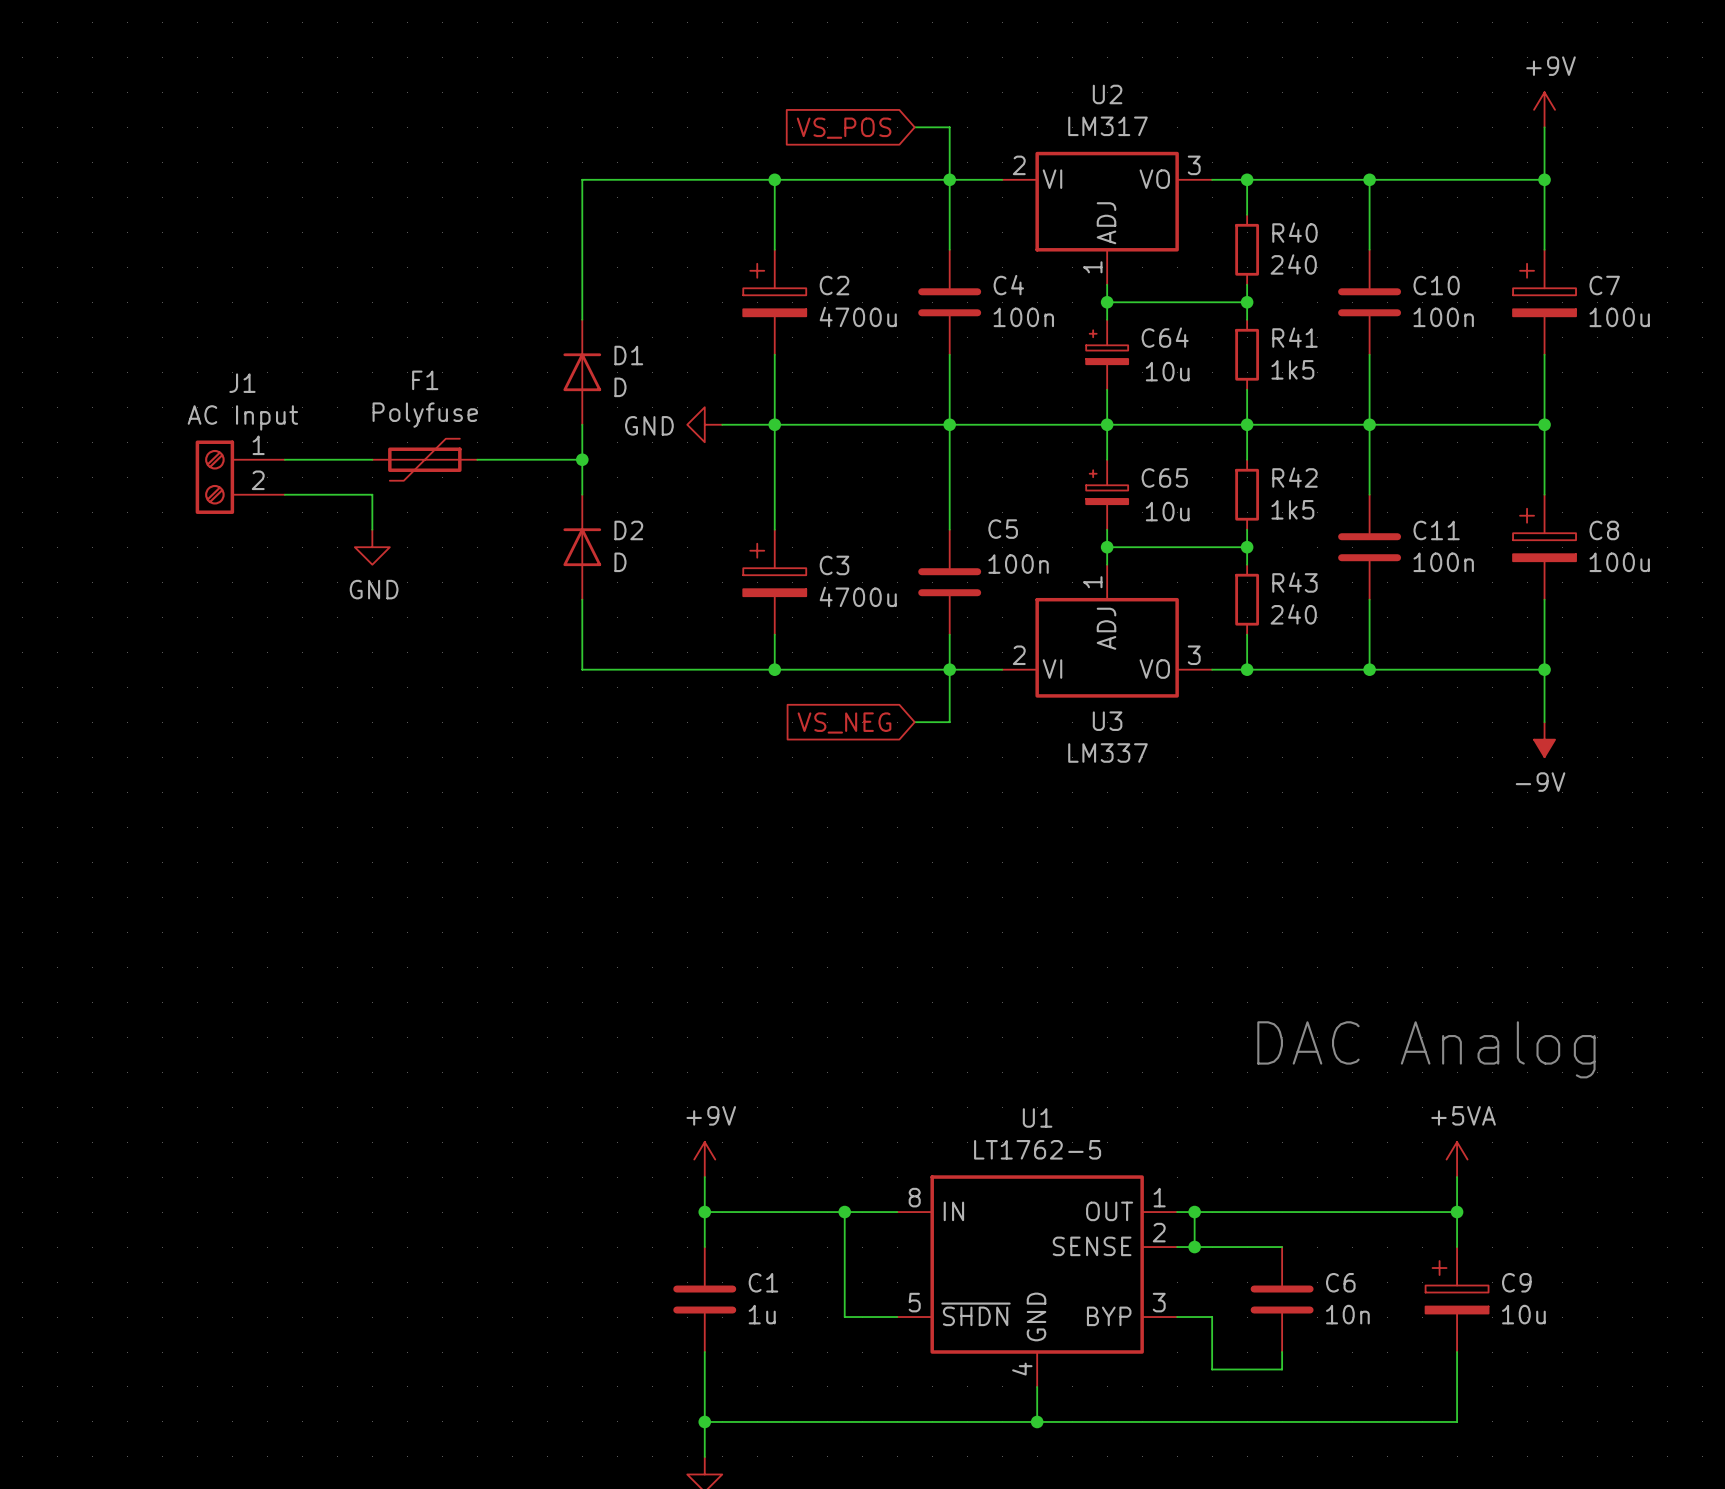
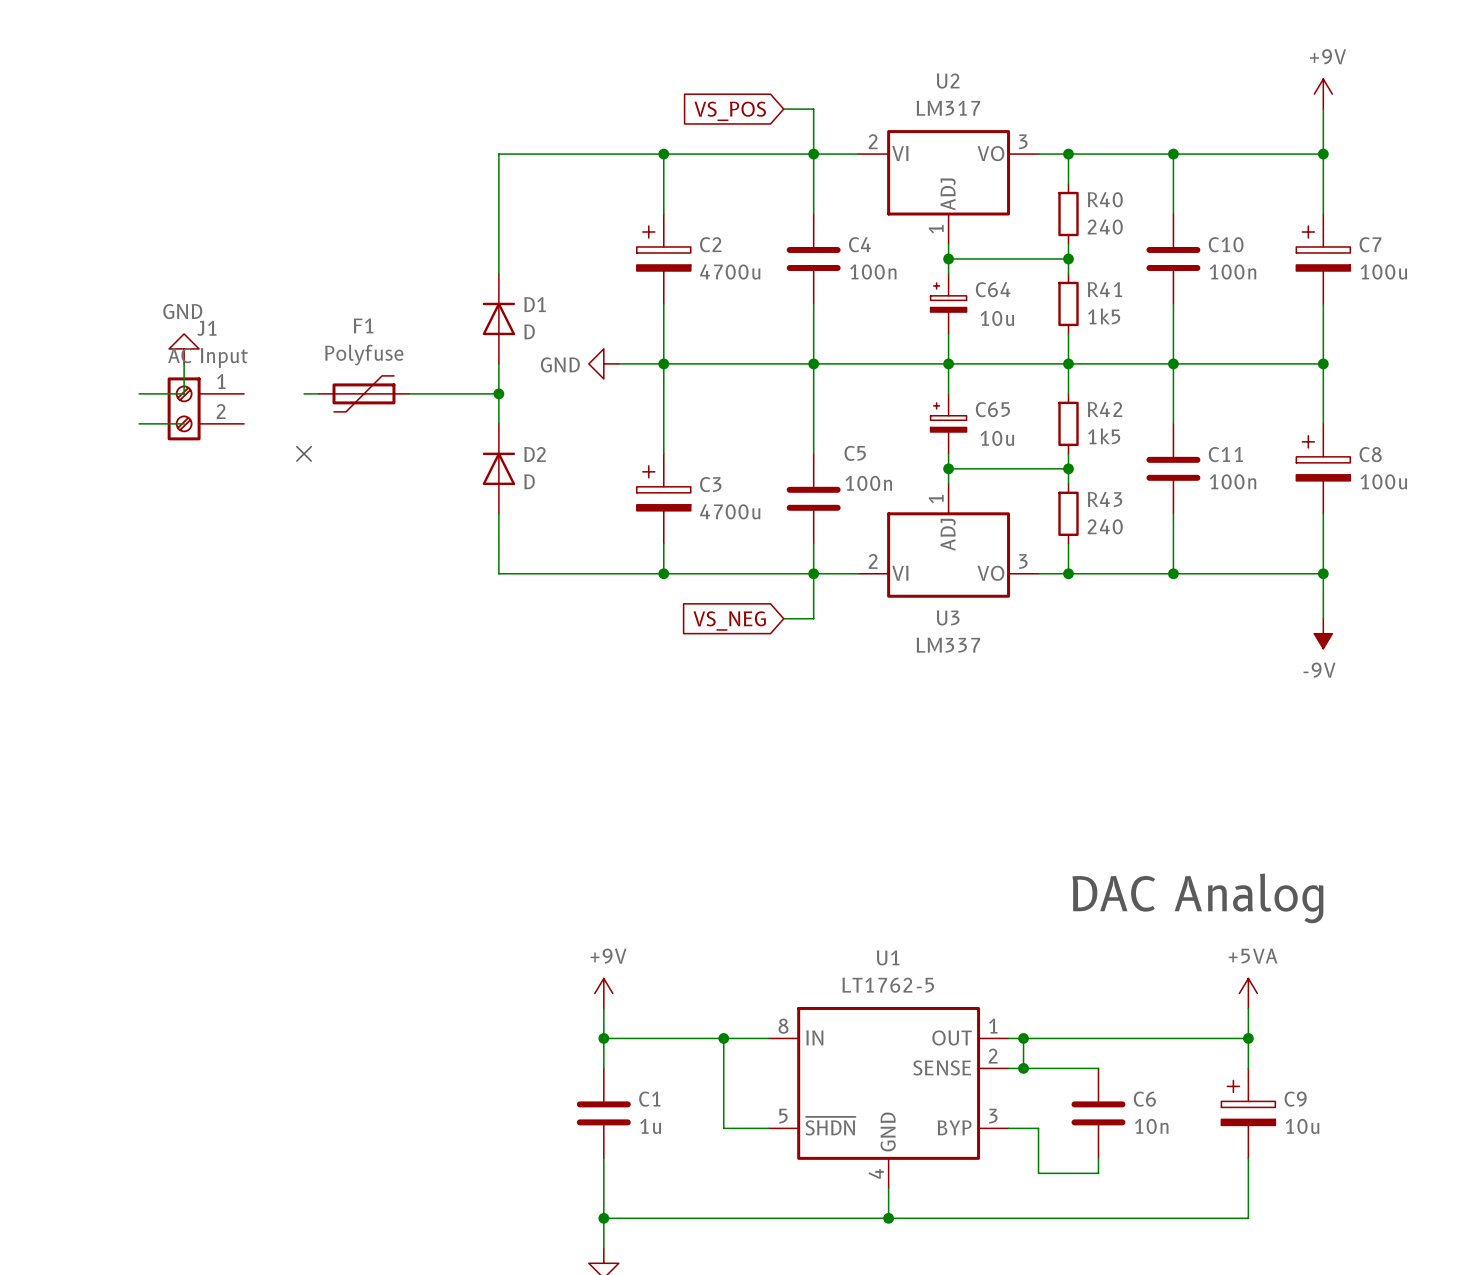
wire: none -> (184, 363) (184, 393) (139, 393)
wire: (284, 459) (354, 459) -> none
wire: none -> (139, 423) (184, 423)
wire: (284, 494) (372, 494) (372, 529) -> none
no-connect mark: none -> (304, 453)
power symbol rotation: 0° (372, 547) -> 180° (184, 348)
power symbol position: GND (372, 547) -> GND (184, 348)

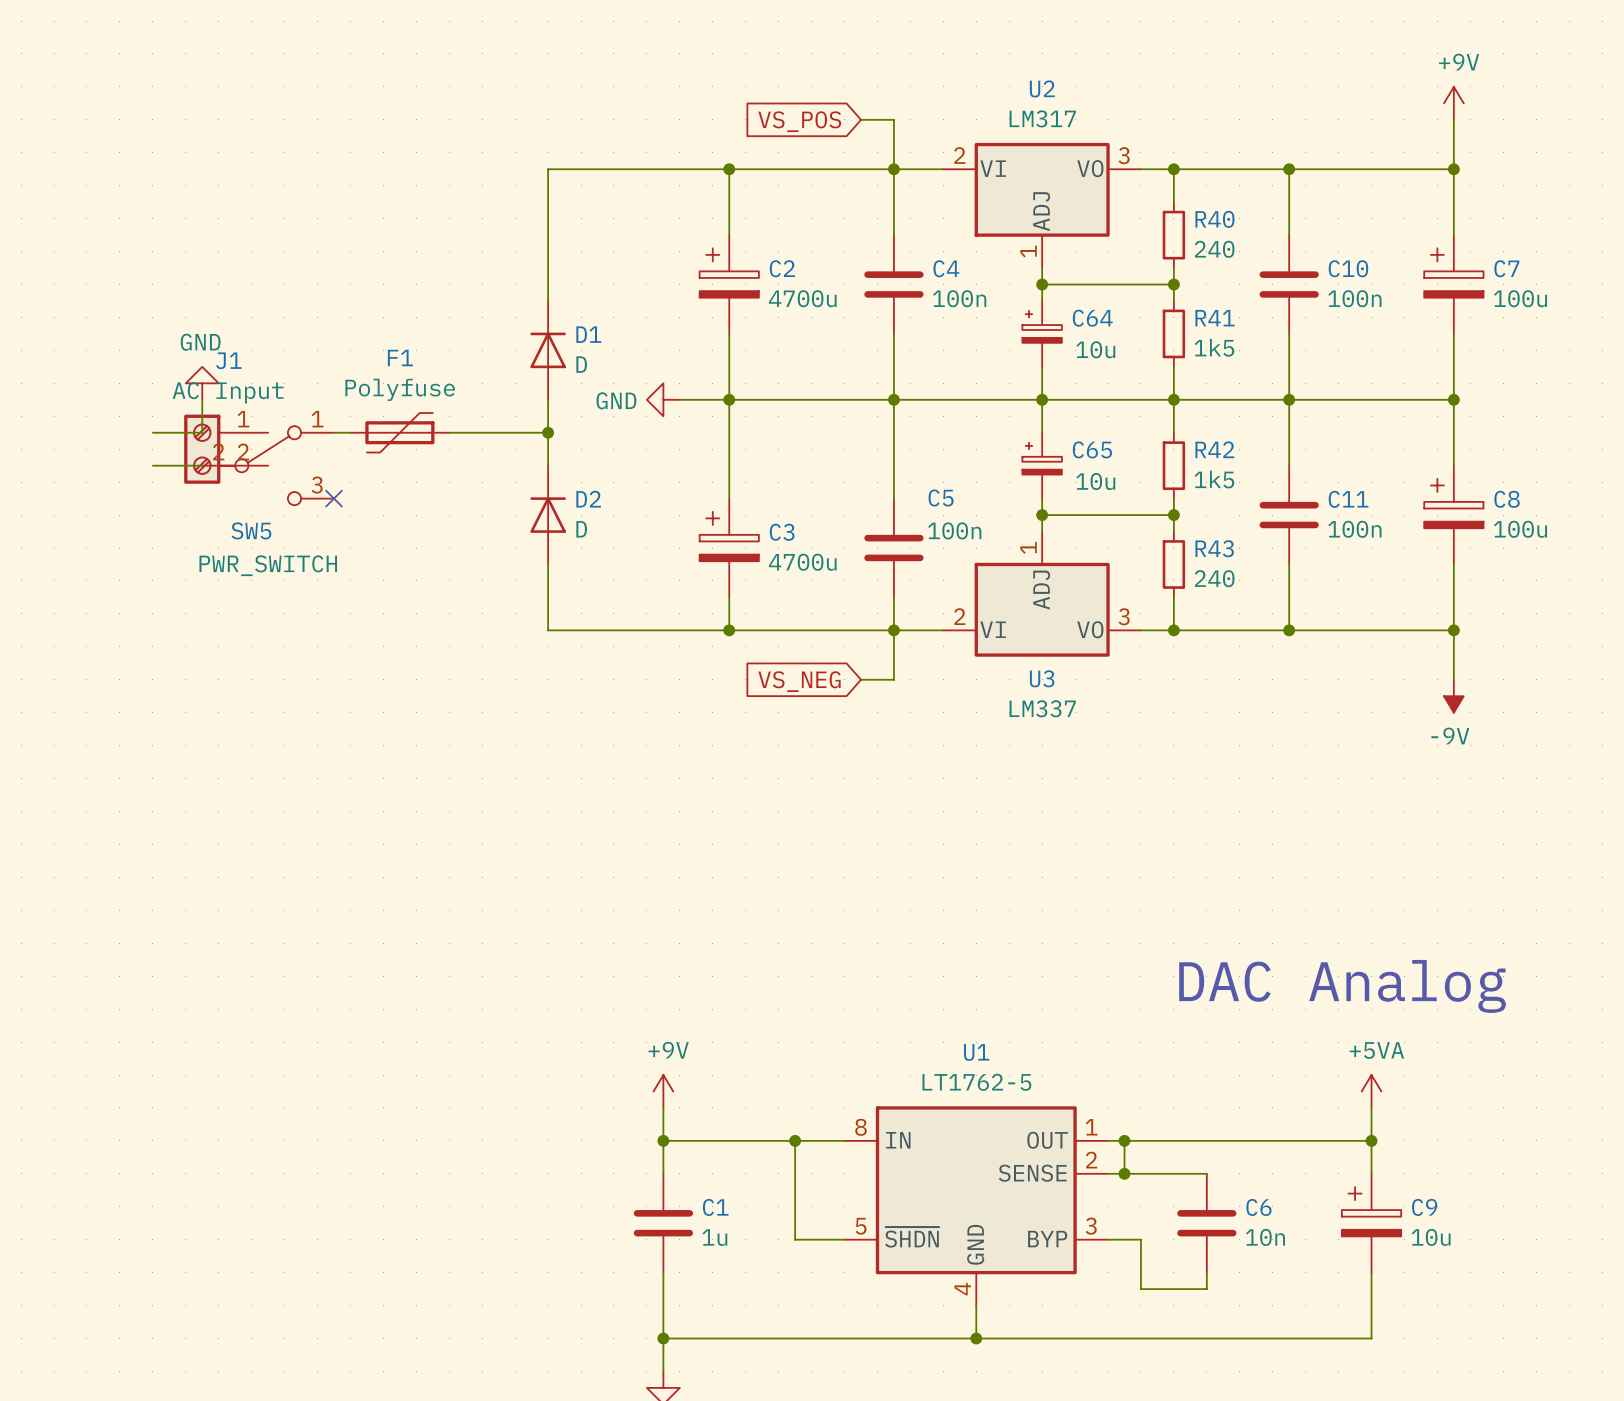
SW5: none -> PWR_SWITCH (268, 465)

